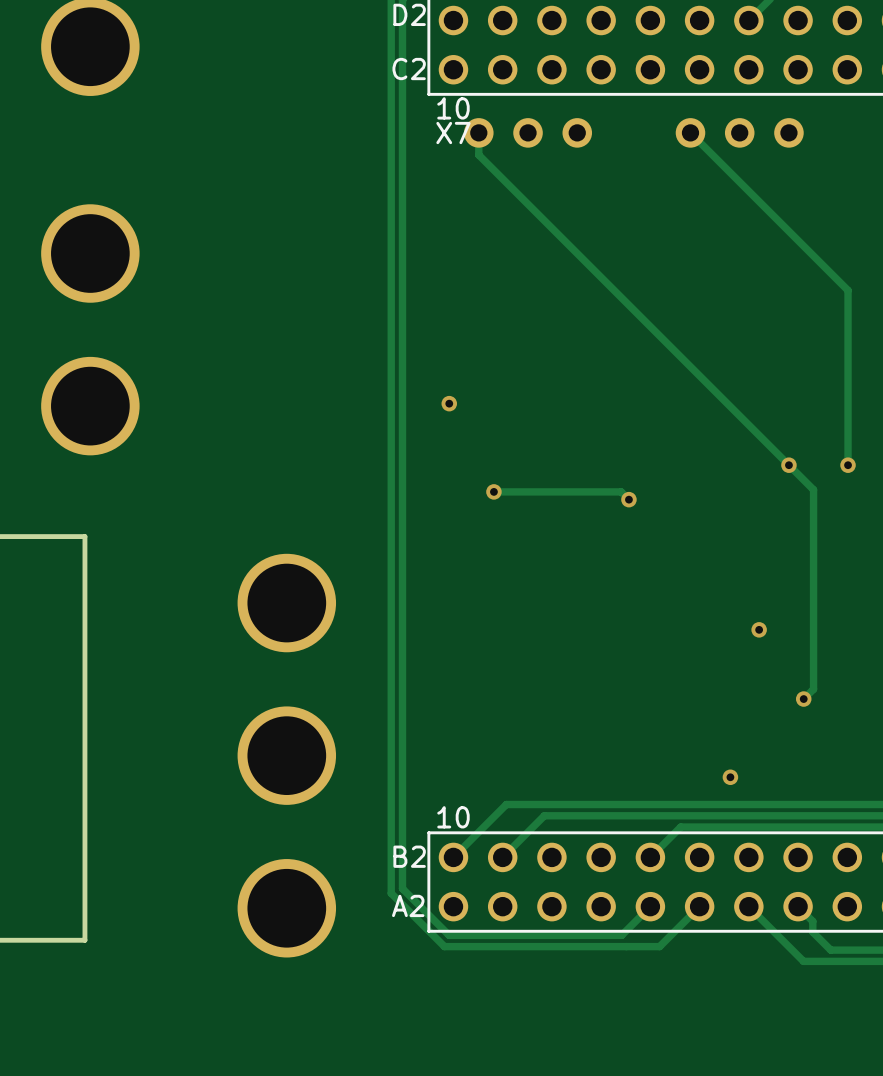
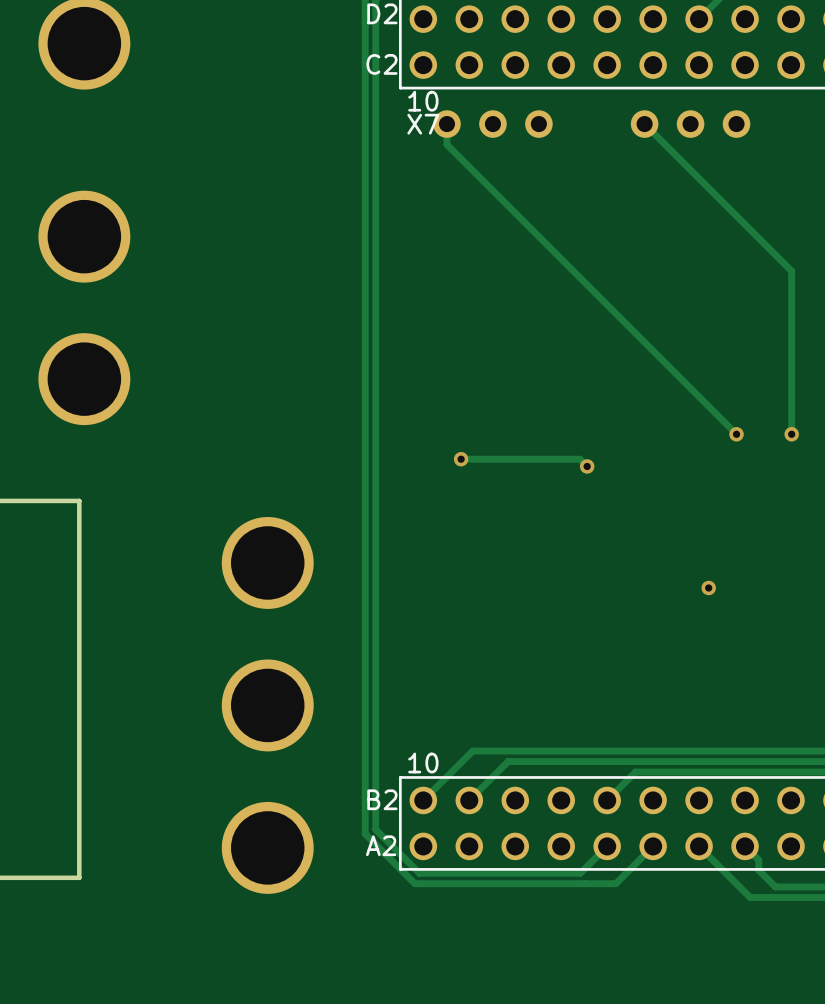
via: (449, 403) -> none
track: (788, 465) (813, 489) (813, 689) (803, 699) -> none
via: (803, 699) -> none
via: (730, 777) -> none

